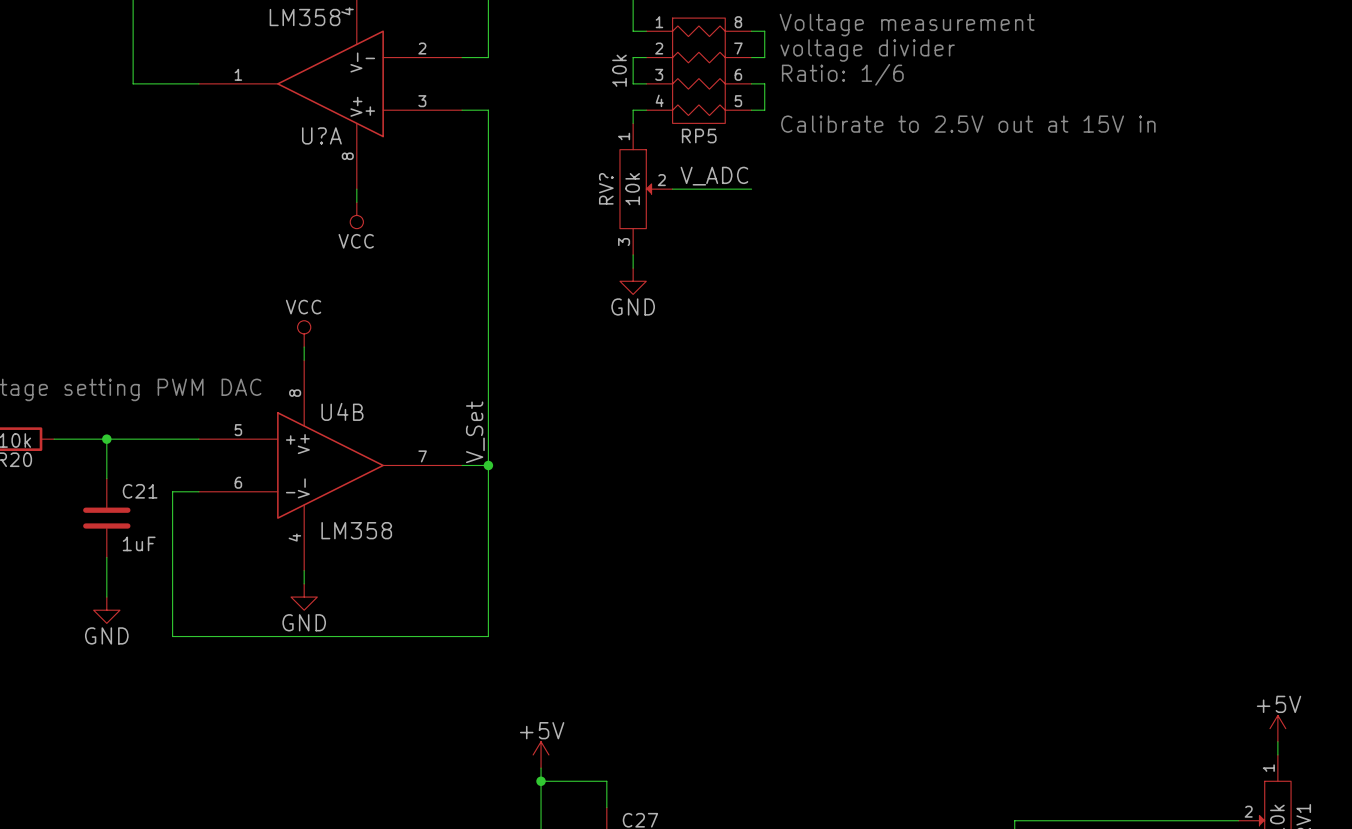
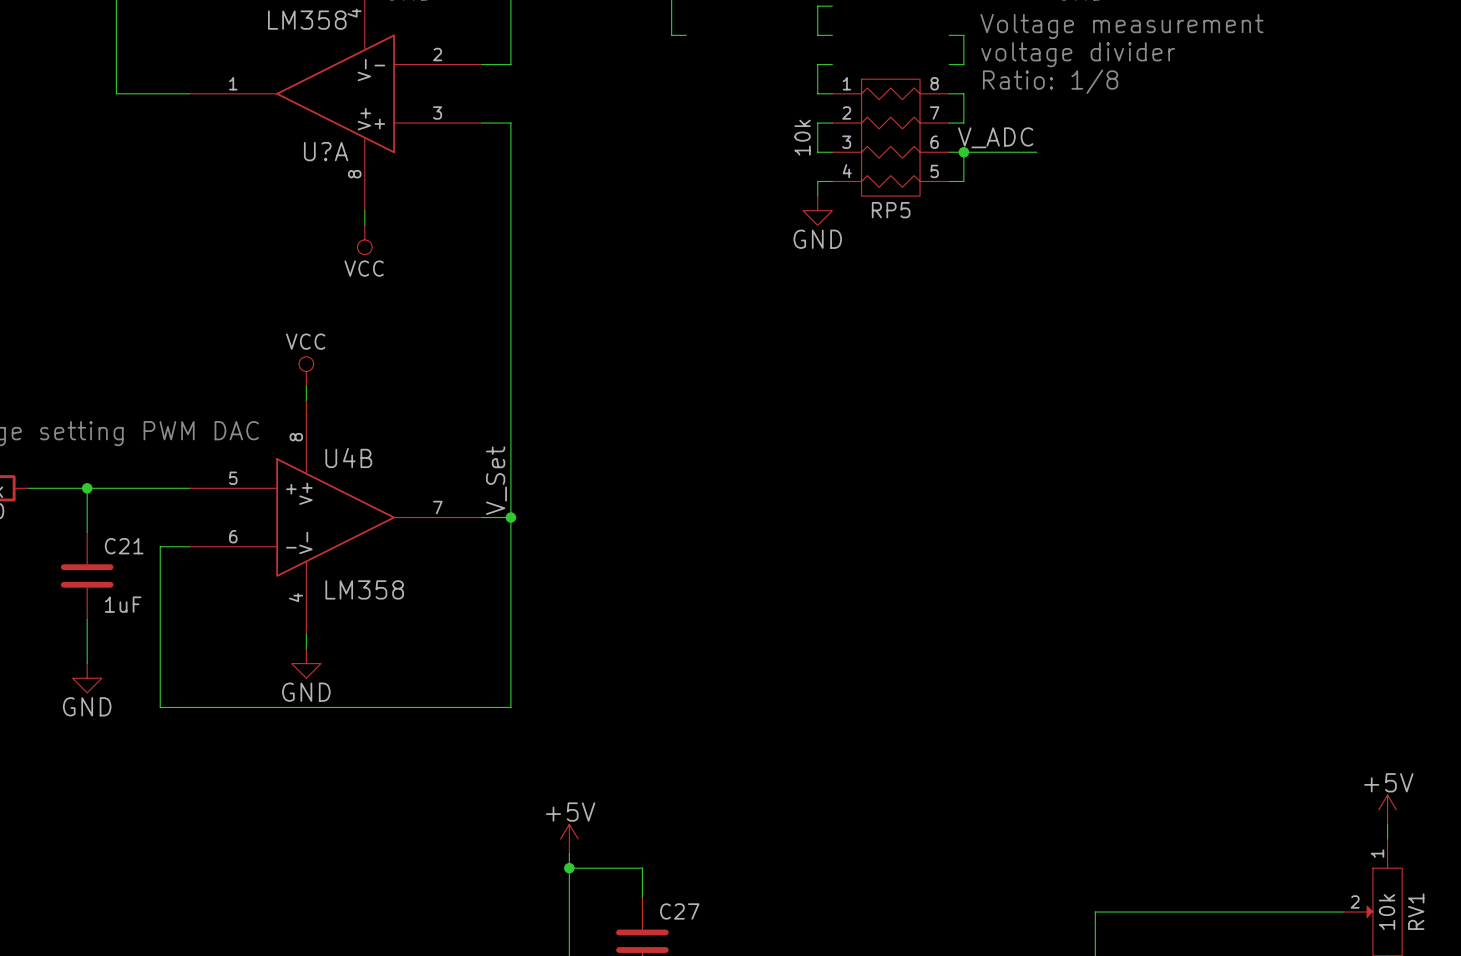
wire: none -> (832, 6) (817, 6) (817, 35) (832, 35)
text position: Voltage measurement (907, 25) -> Voltage measurement (1121, 26)
wire: (751, 31) (764, 31) (764, 57) (751, 57) -> (949, 35) (963, 35) (963, 64) (949, 64)
text position: voltage divider (867, 50) -> voltage divider (1078, 54)
wire: (646, 57) (633, 57) (633, 83) (646, 83) -> (832, 64) (817, 64) (817, 93) (832, 93)
RP5 position: (698, 70) -> (890, 137)
text: Ratio: 1/6 (842, 74) -> Ratio: 1/8 (1050, 81)
wire: (751, 83) (764, 83) (764, 110) (751, 110) -> (949, 93) (963, 93) (963, 123) (949, 123)
wire: (646, 110) (633, 110) (633, 123) -> (832, 181) (817, 181) (817, 196)
wire: none -> (832, 123) (817, 123) (817, 152) (832, 152)
text: Calibrate to 2.5V out at 15V in (968, 124) -> none
wire: none -> (963, 152) (963, 181) (949, 181)
junction: none -> (963, 152)
label position: V_ADC (714, 176) -> V_ADC (995, 137)
RV?: 10k (646, 189) -> none
wire: (672, 189) (751, 189) -> (949, 152) (1036, 152)
wire: (633, 254) (633, 268) -> none
power symbol position: GND (633, 281) -> GND (817, 210)

